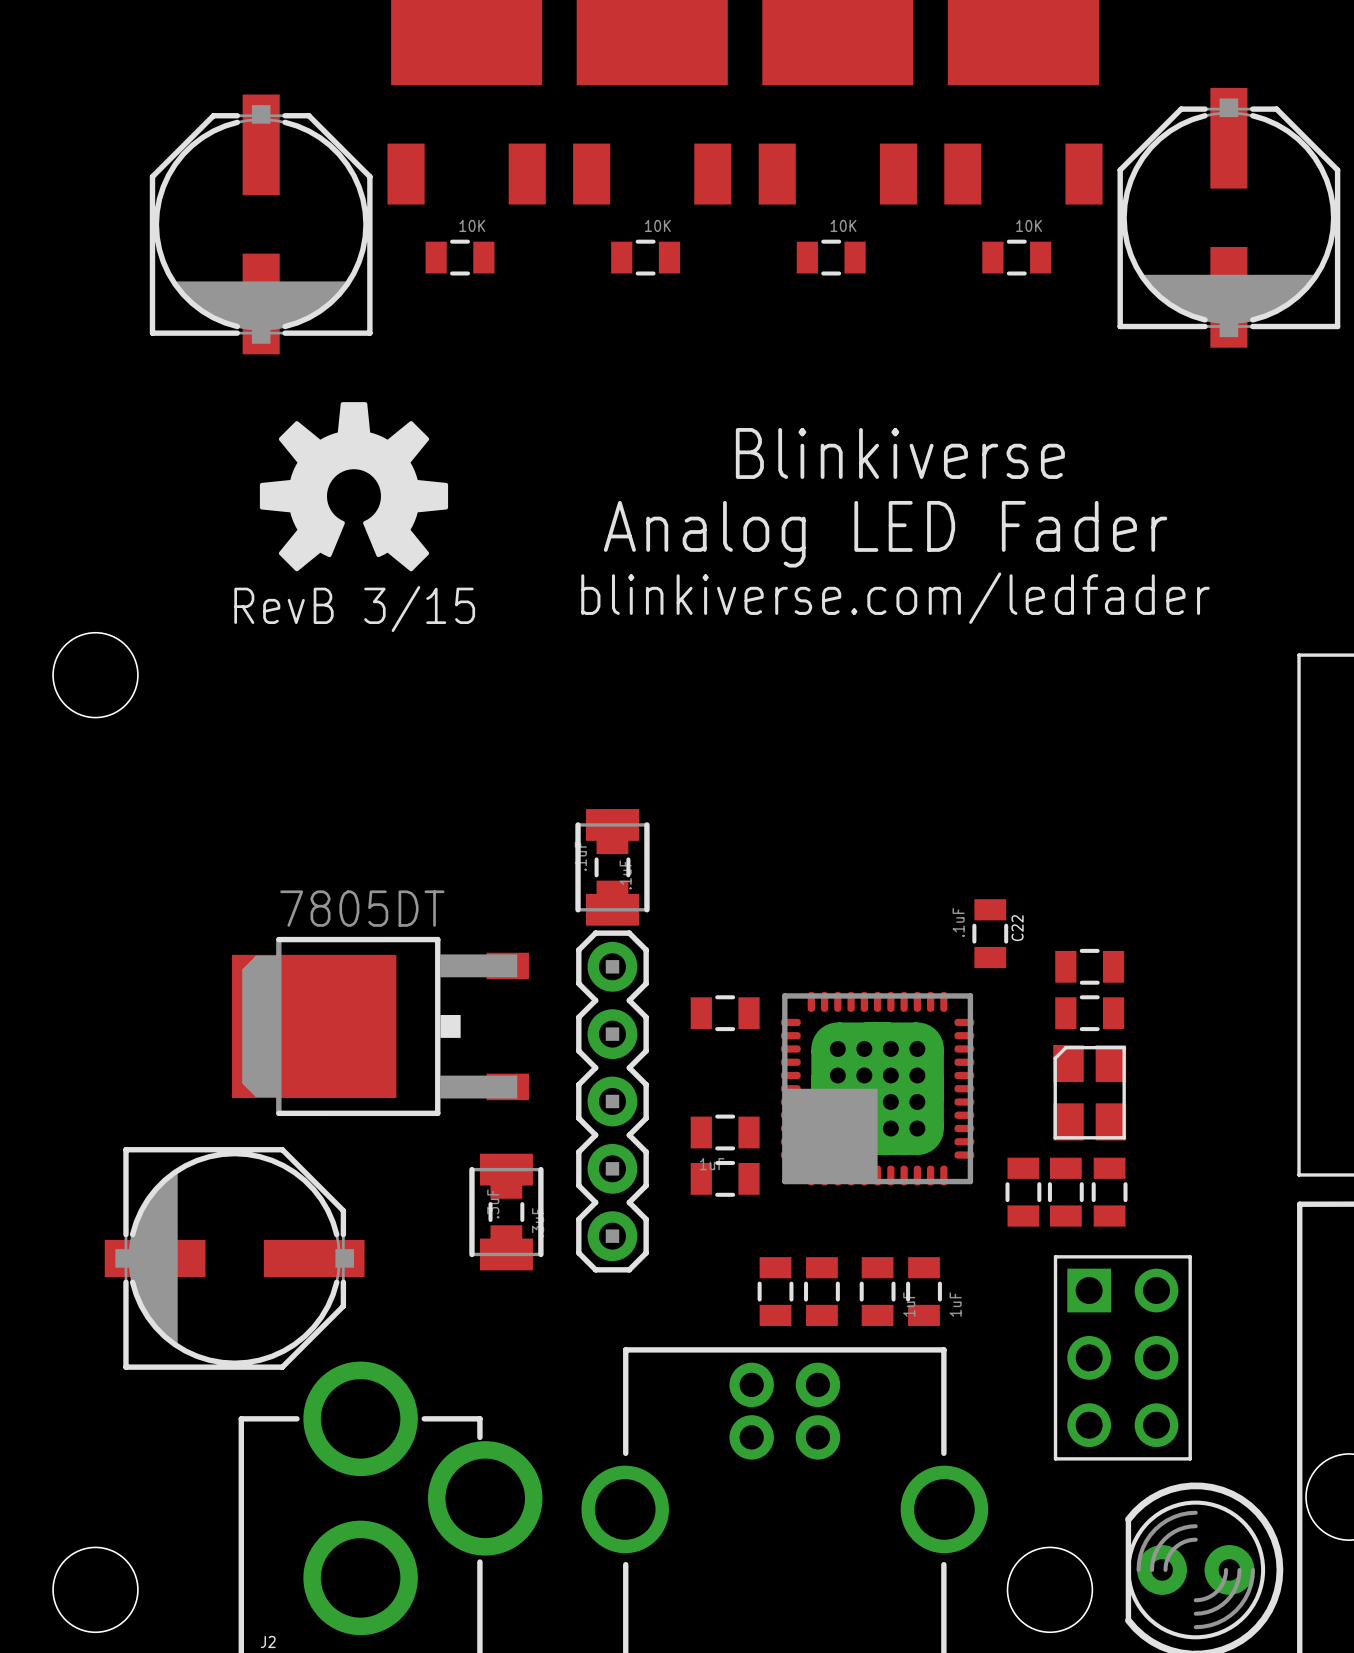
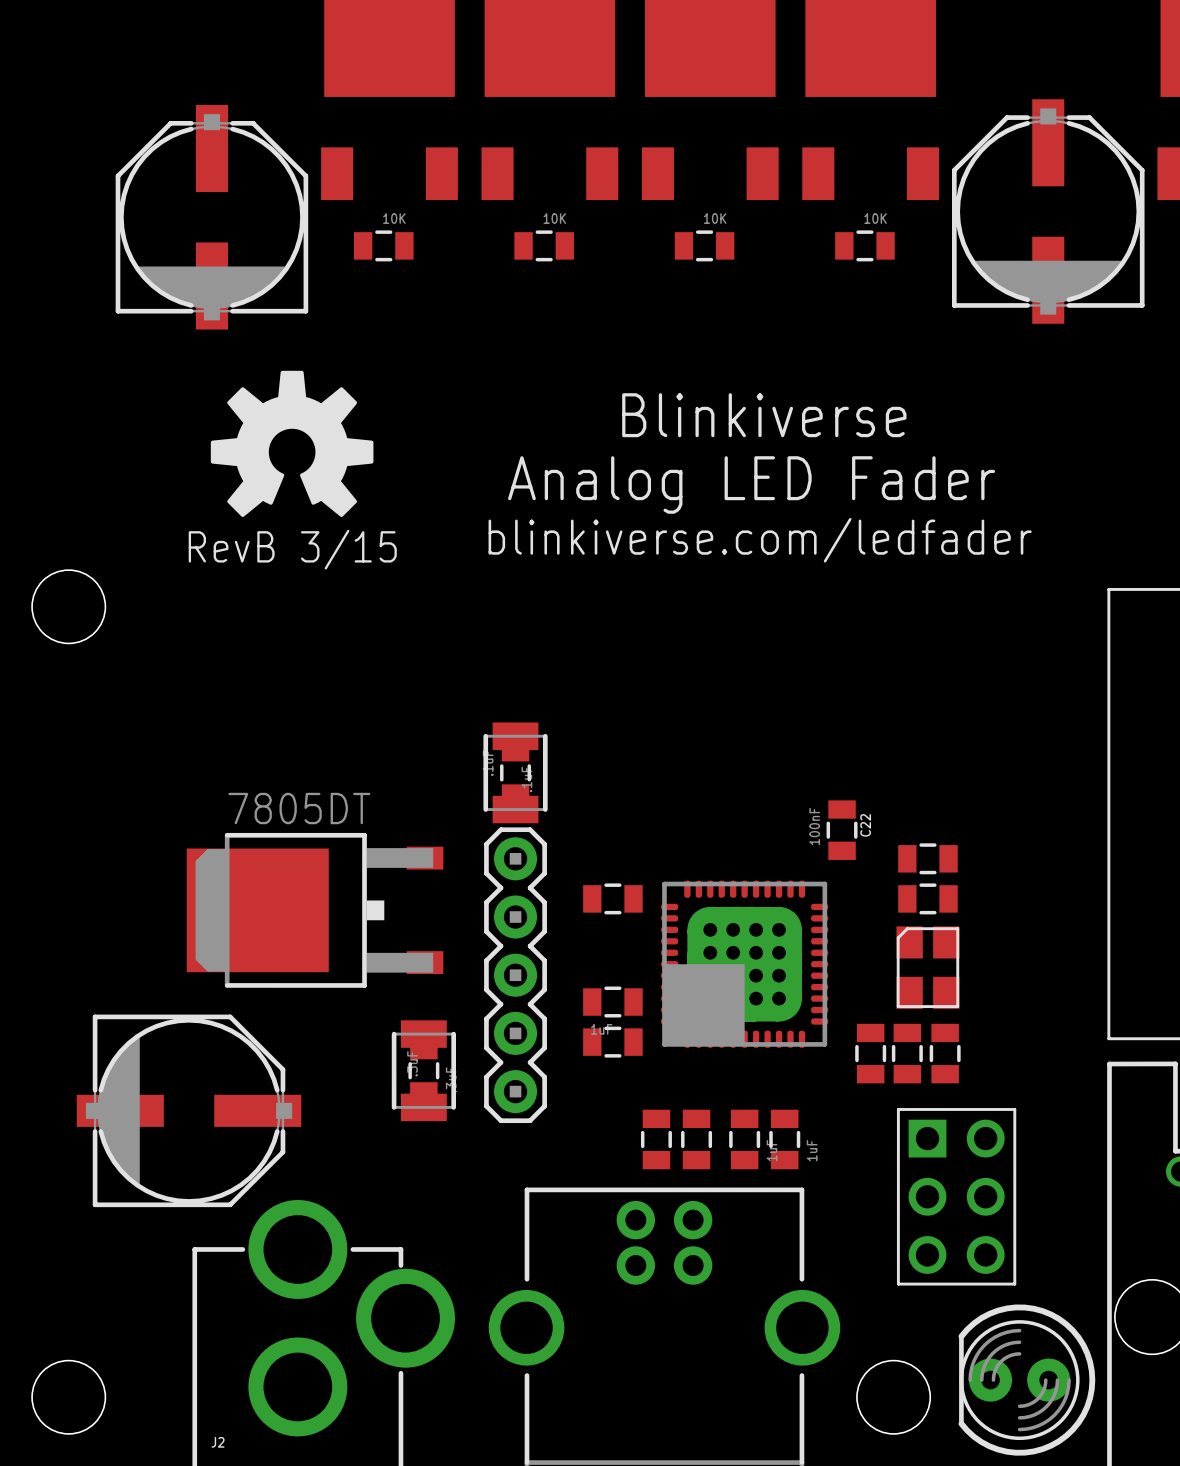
C22 value: .1uF (958, 922) -> 100nF (814, 826)

